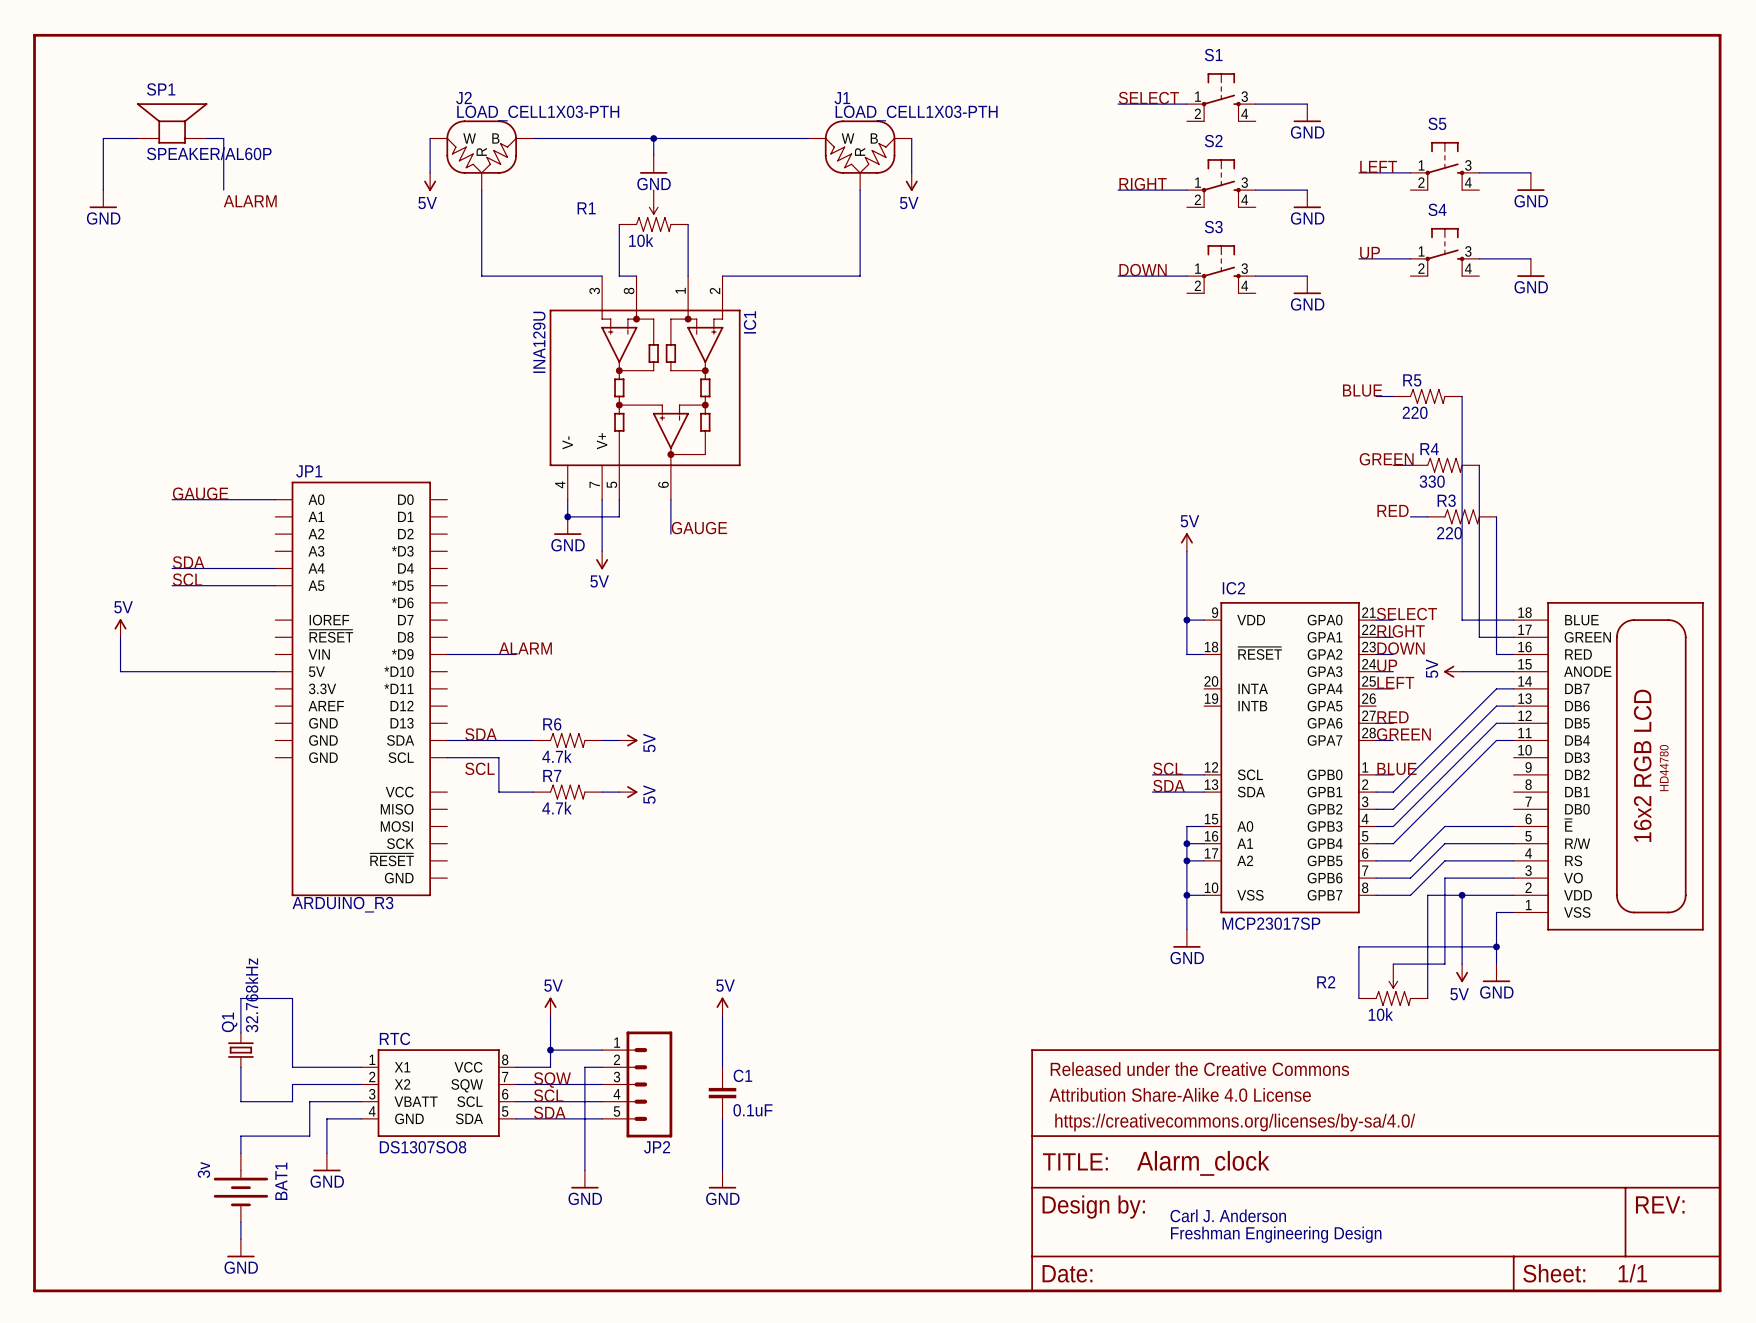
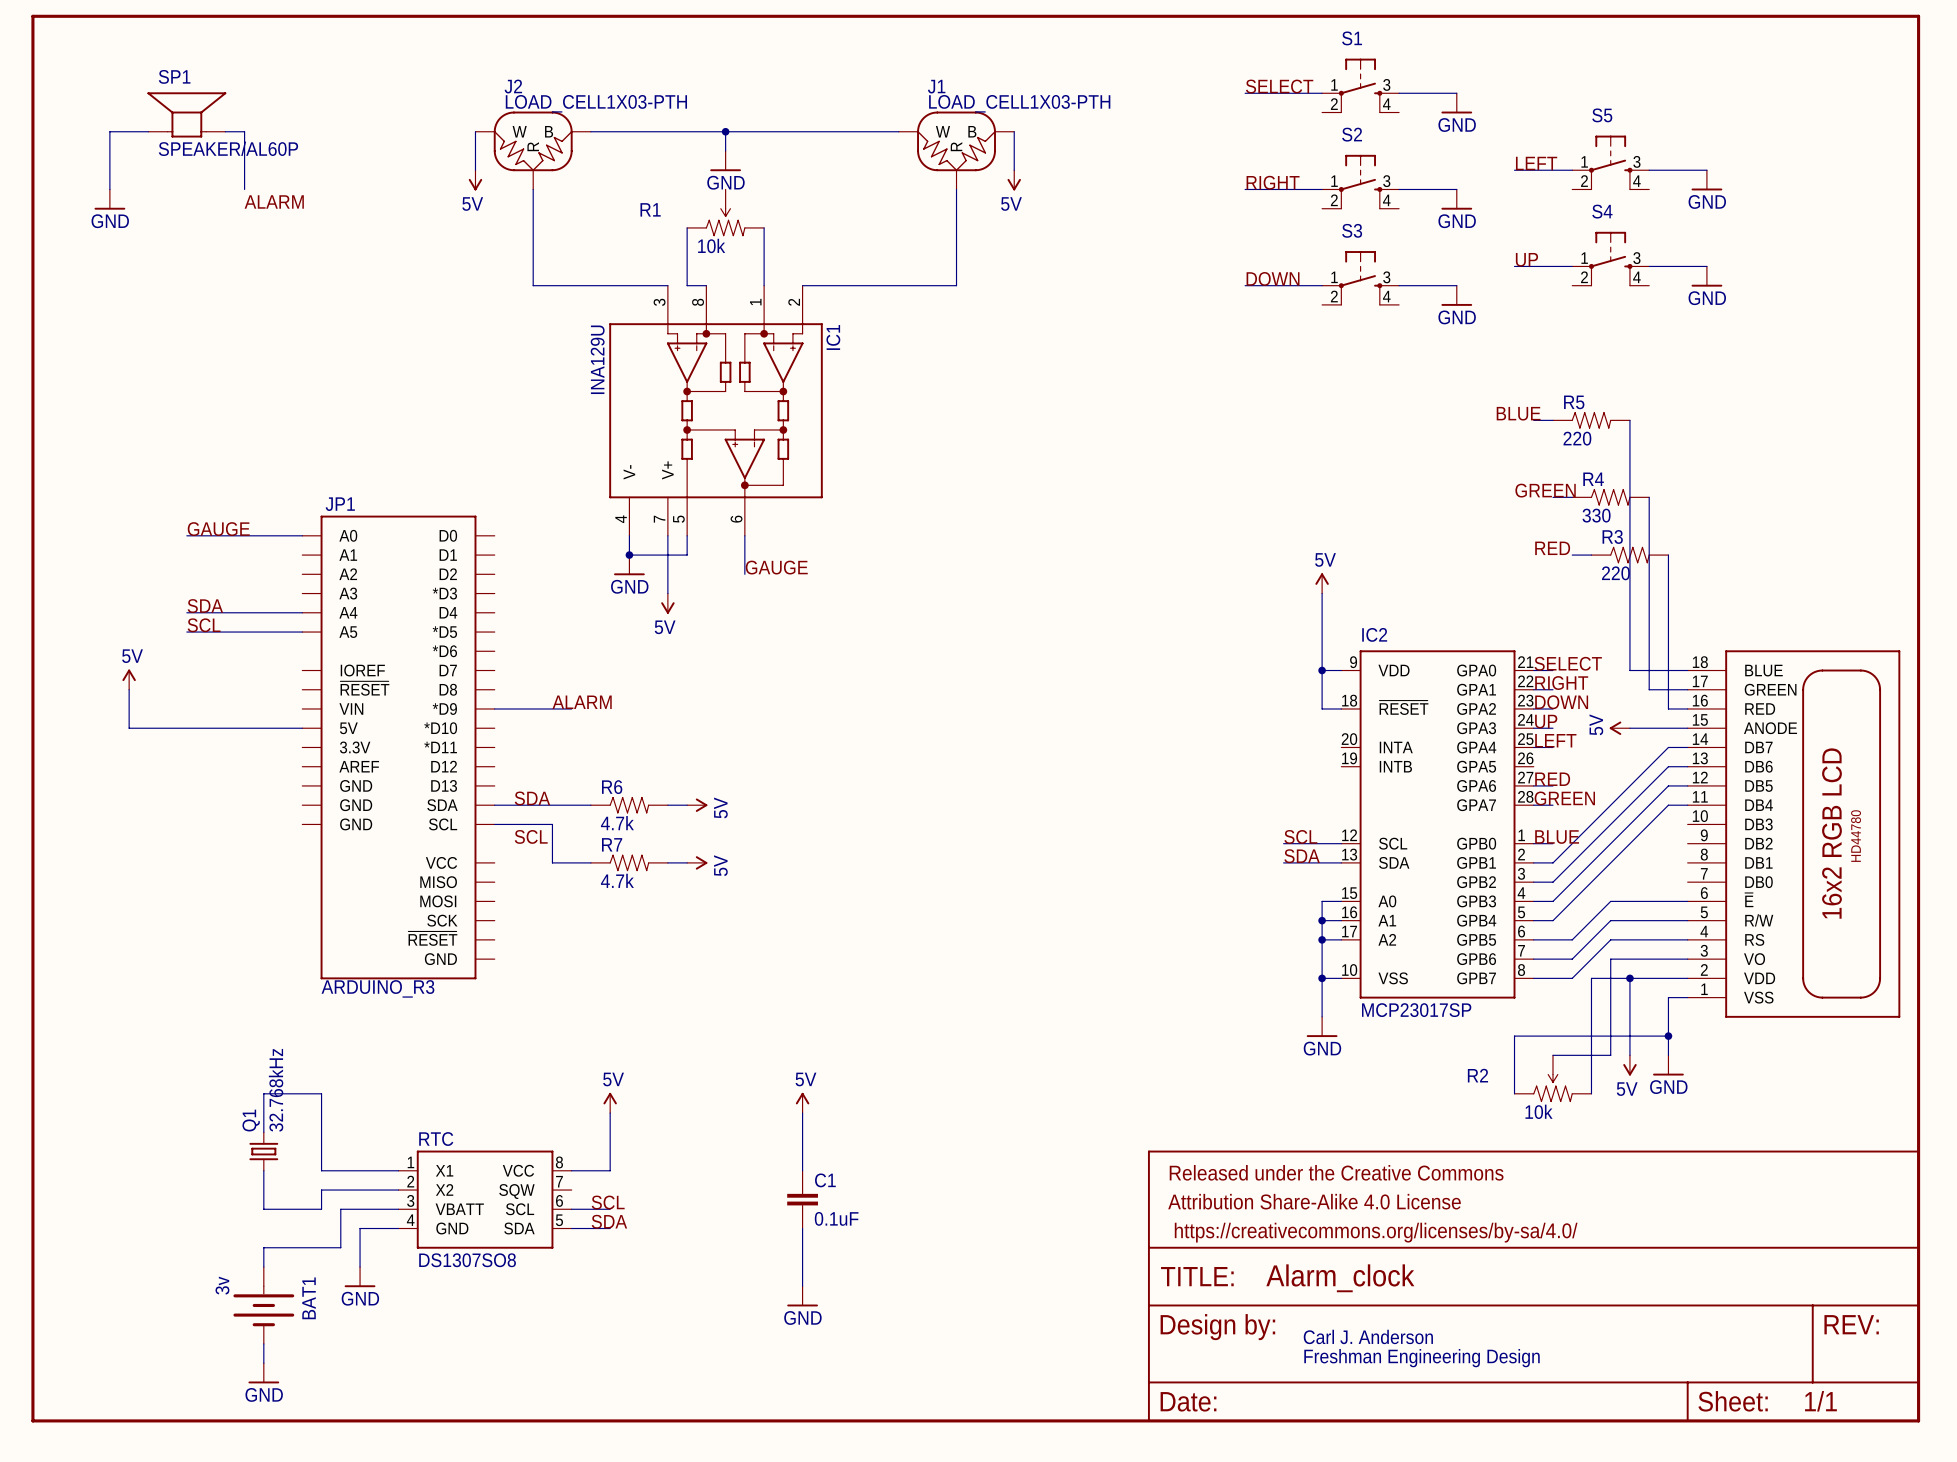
wire: (550, 1050) (602, 1050) -> none
junction: (550, 1050) -> none
wire: (602, 1067) (584, 1067) (584, 1170) -> none
label: SQW (552, 1080) -> none
wire: (516, 1084) (602, 1084) -> none
JP2: (637, 1084) -> none
wire: (550, 1101) (602, 1101) -> none
wire: (550, 1118) (602, 1118) -> none
power symbol: GND (584, 1179) -> none

